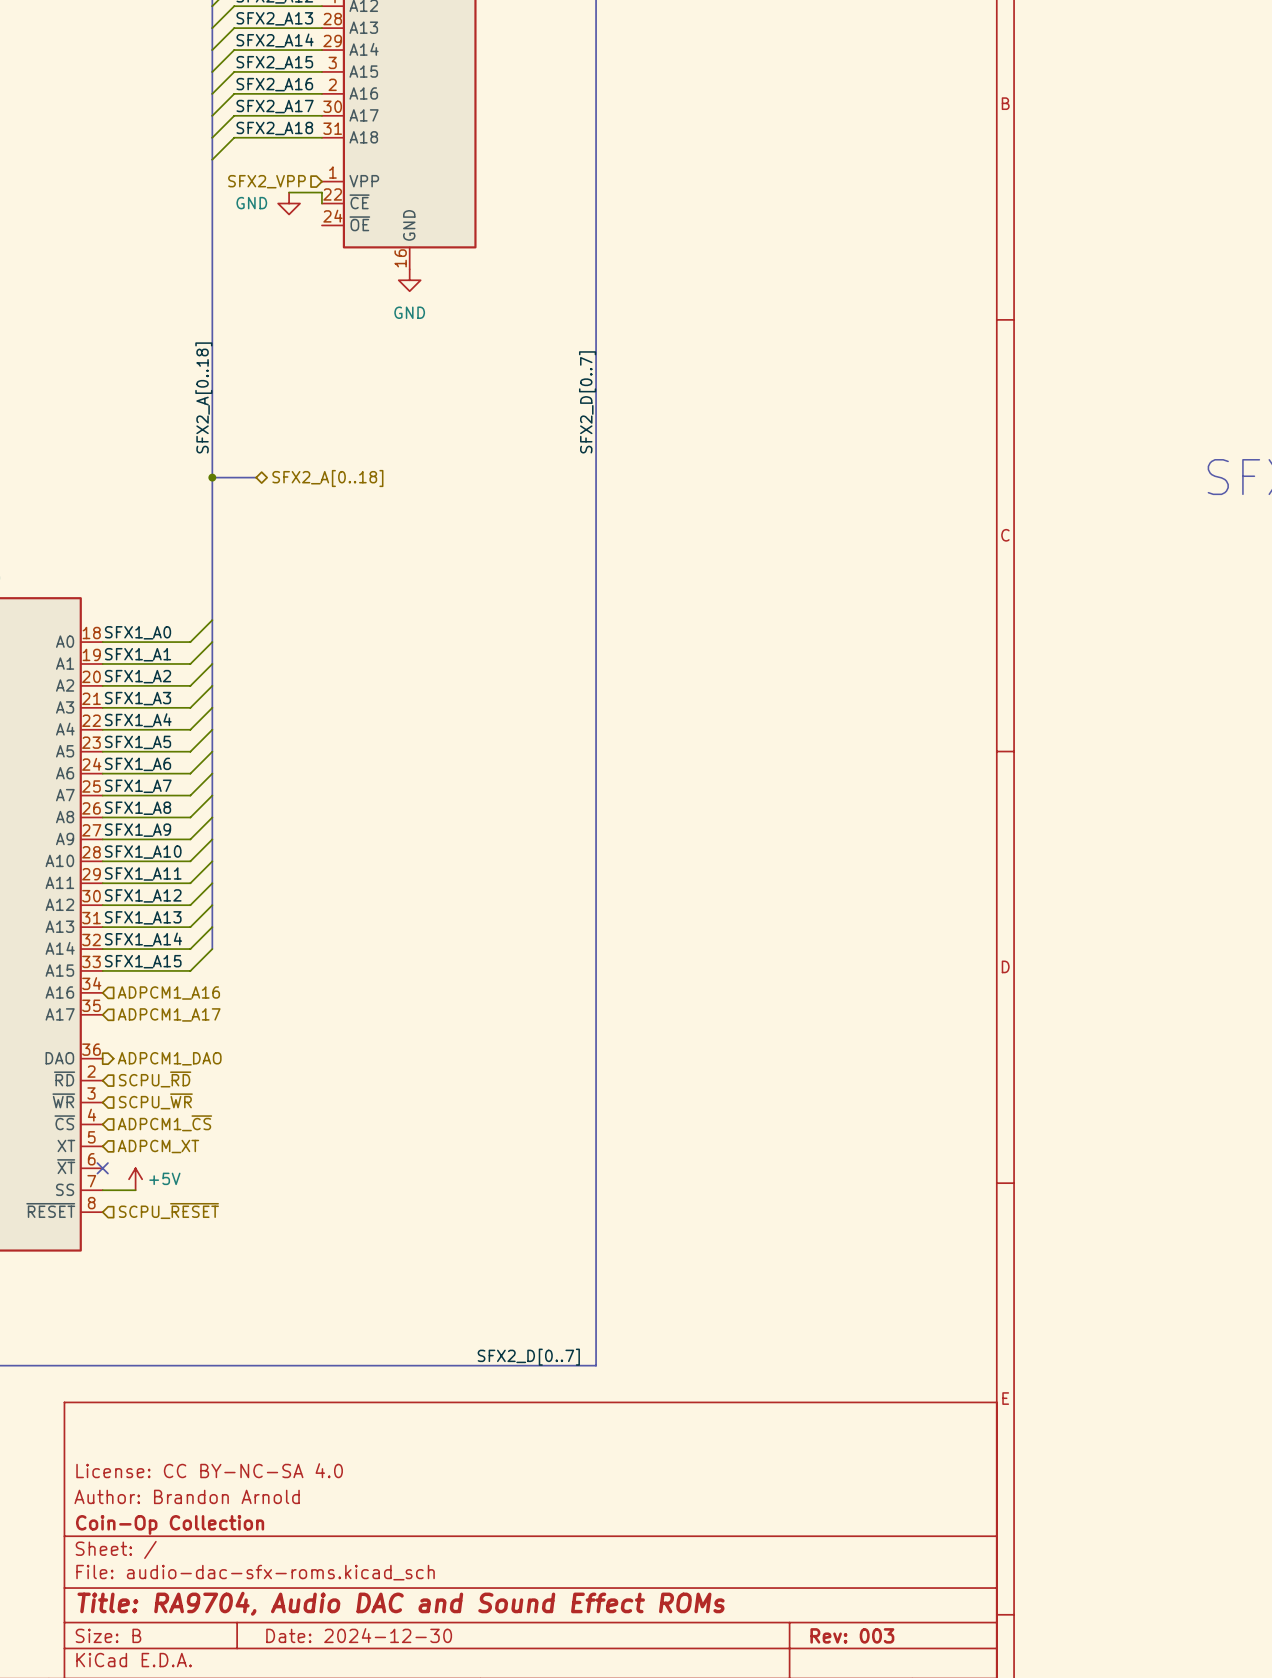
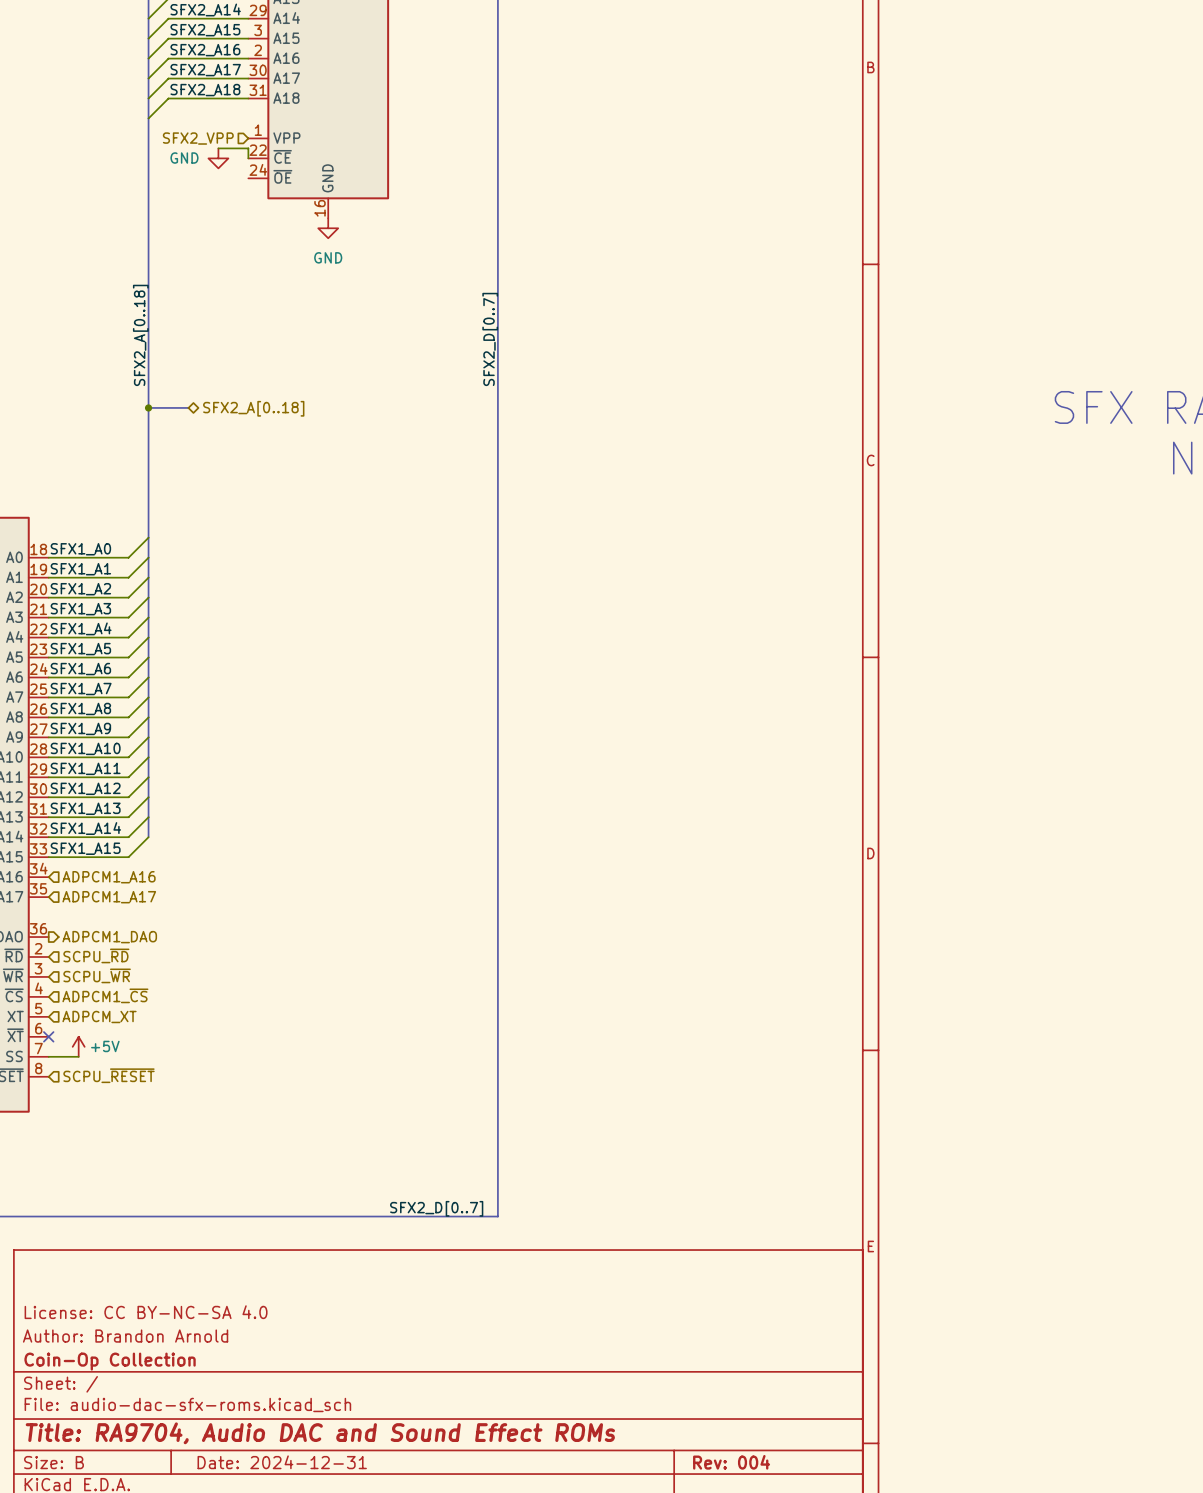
title block: Date: 2024-12-30 (359, 1635) -> Date: 2024-12-31 (282, 1462)
title block: Rev: 003 (852, 1635) -> Rev: 004 (731, 1462)

